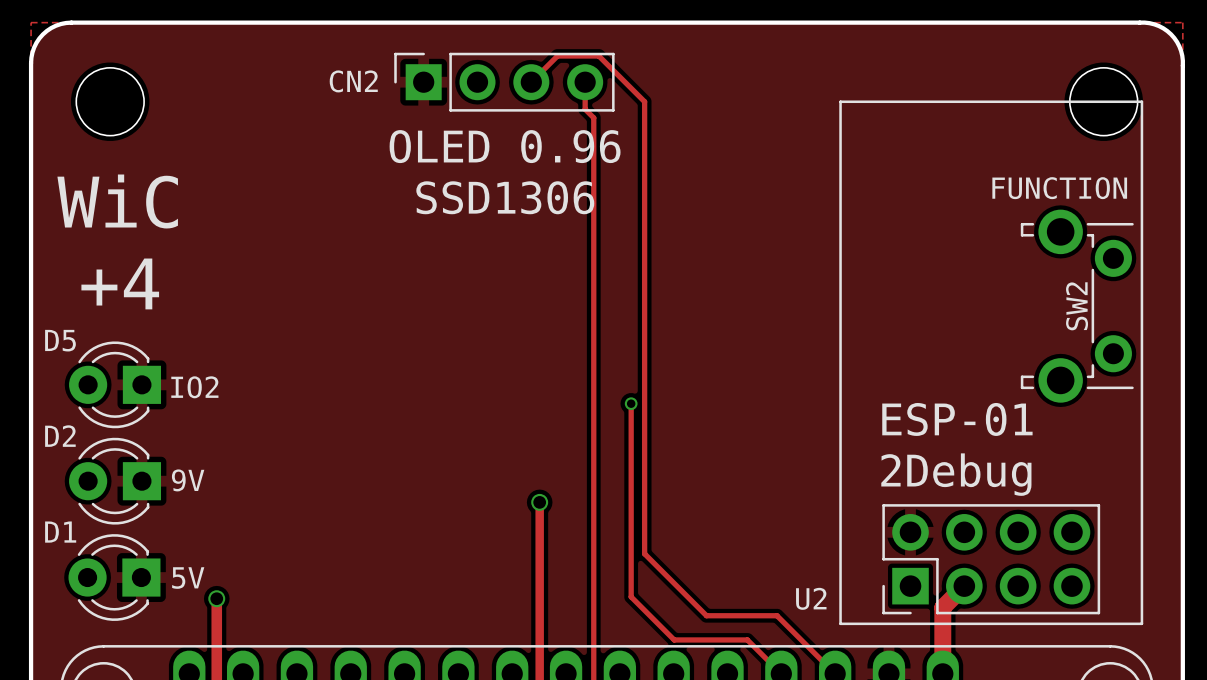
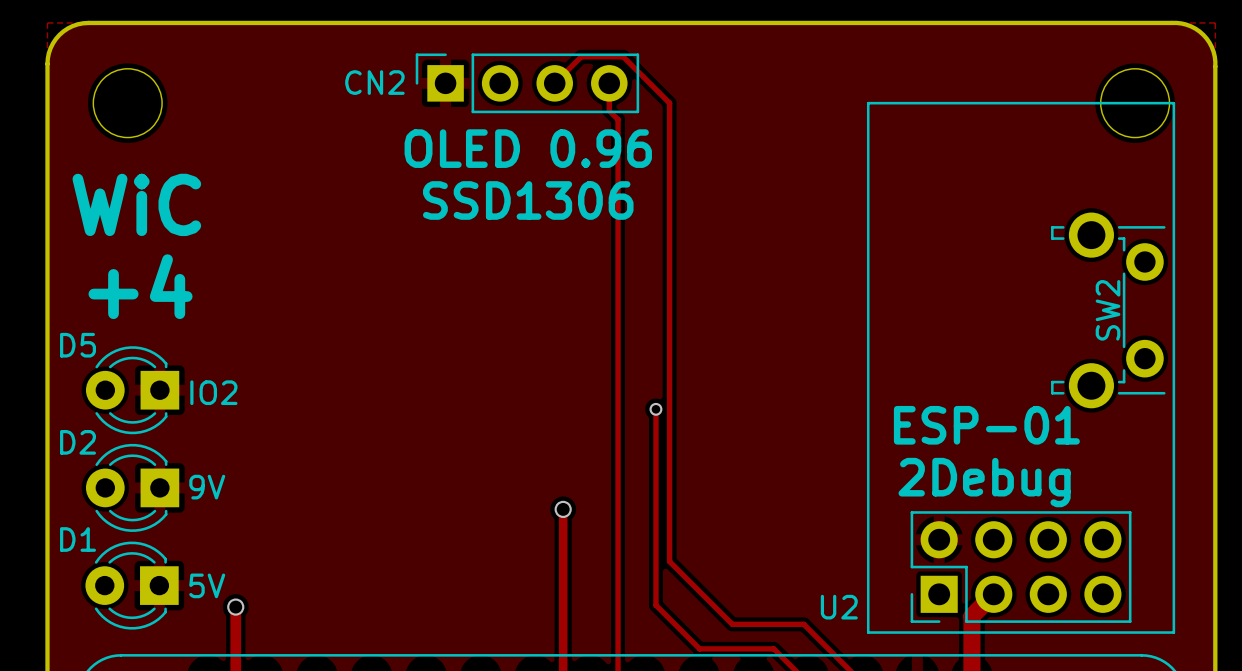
text: FUNCTION (1059, 188) -> none

